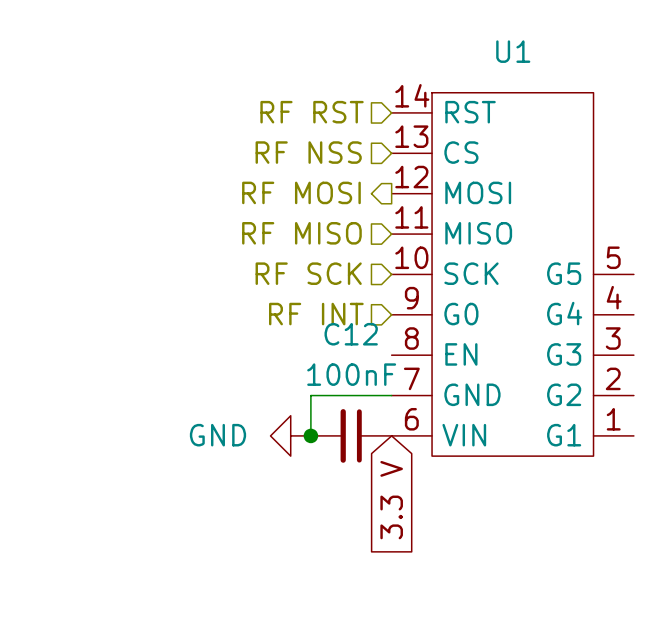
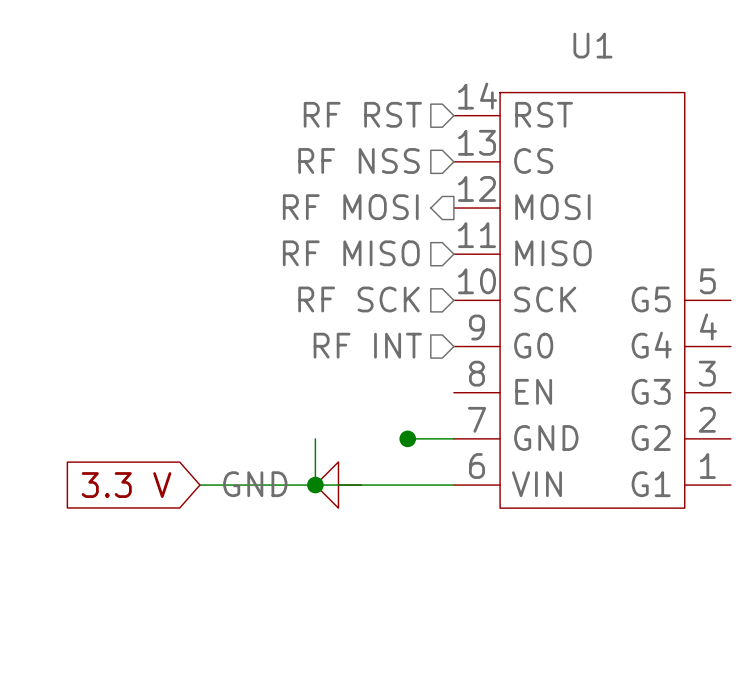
wire: none -> (315, 438) (315, 485)
wire: (351, 395) (310, 395) (310, 435) -> none
junction: none -> (407, 438)
wire: none -> (199, 485) (453, 485)
junction: none -> (315, 485)
junction: (310, 435) -> none
C12: 100nF (351, 435) -> none
global label rotation: 0° (391, 500) -> 90° clockwise (126, 485)
global label position: 3.3 V (391, 500) -> 3.3 V (126, 485)

